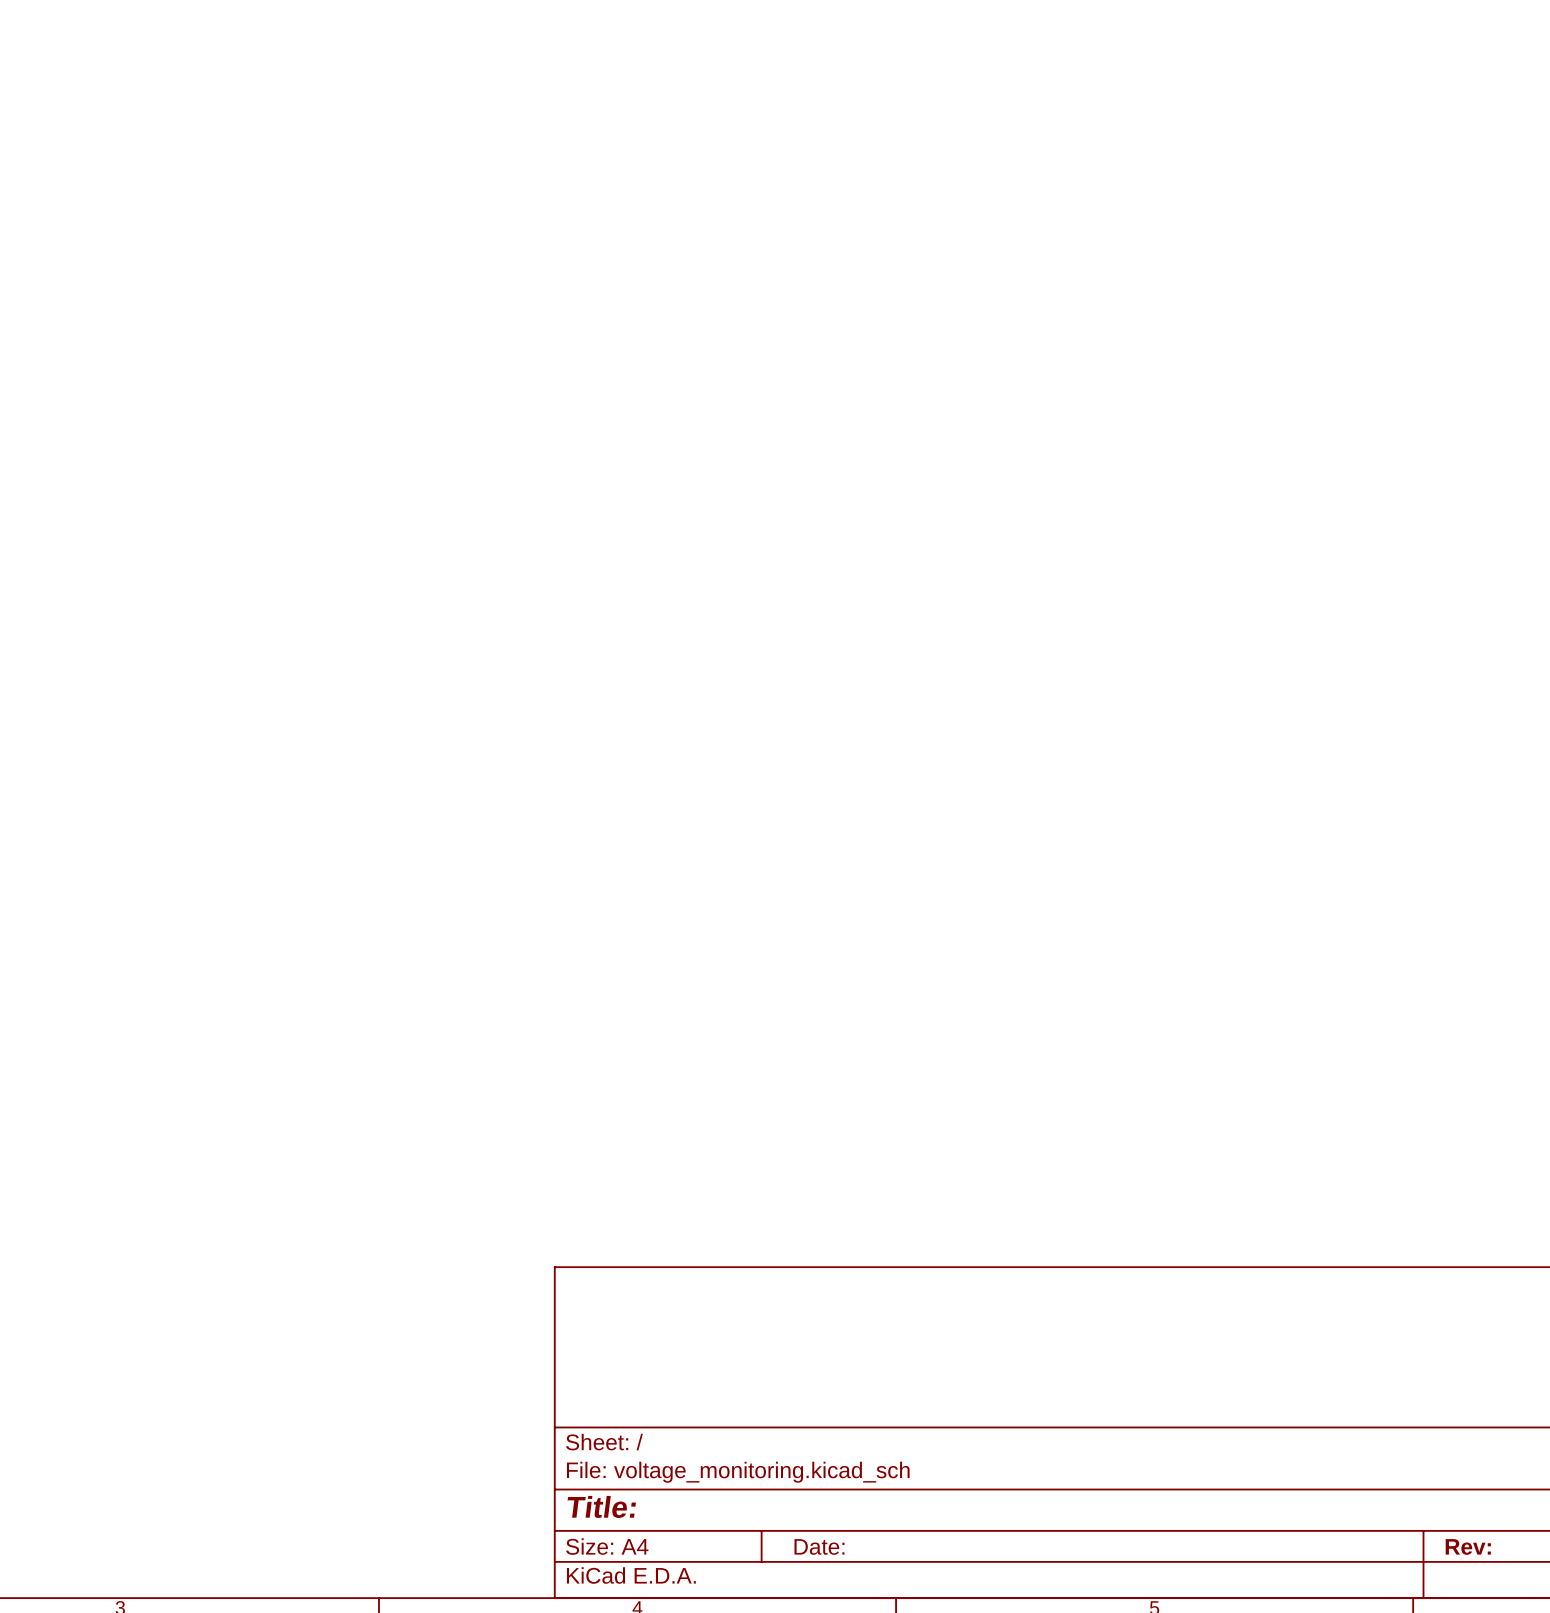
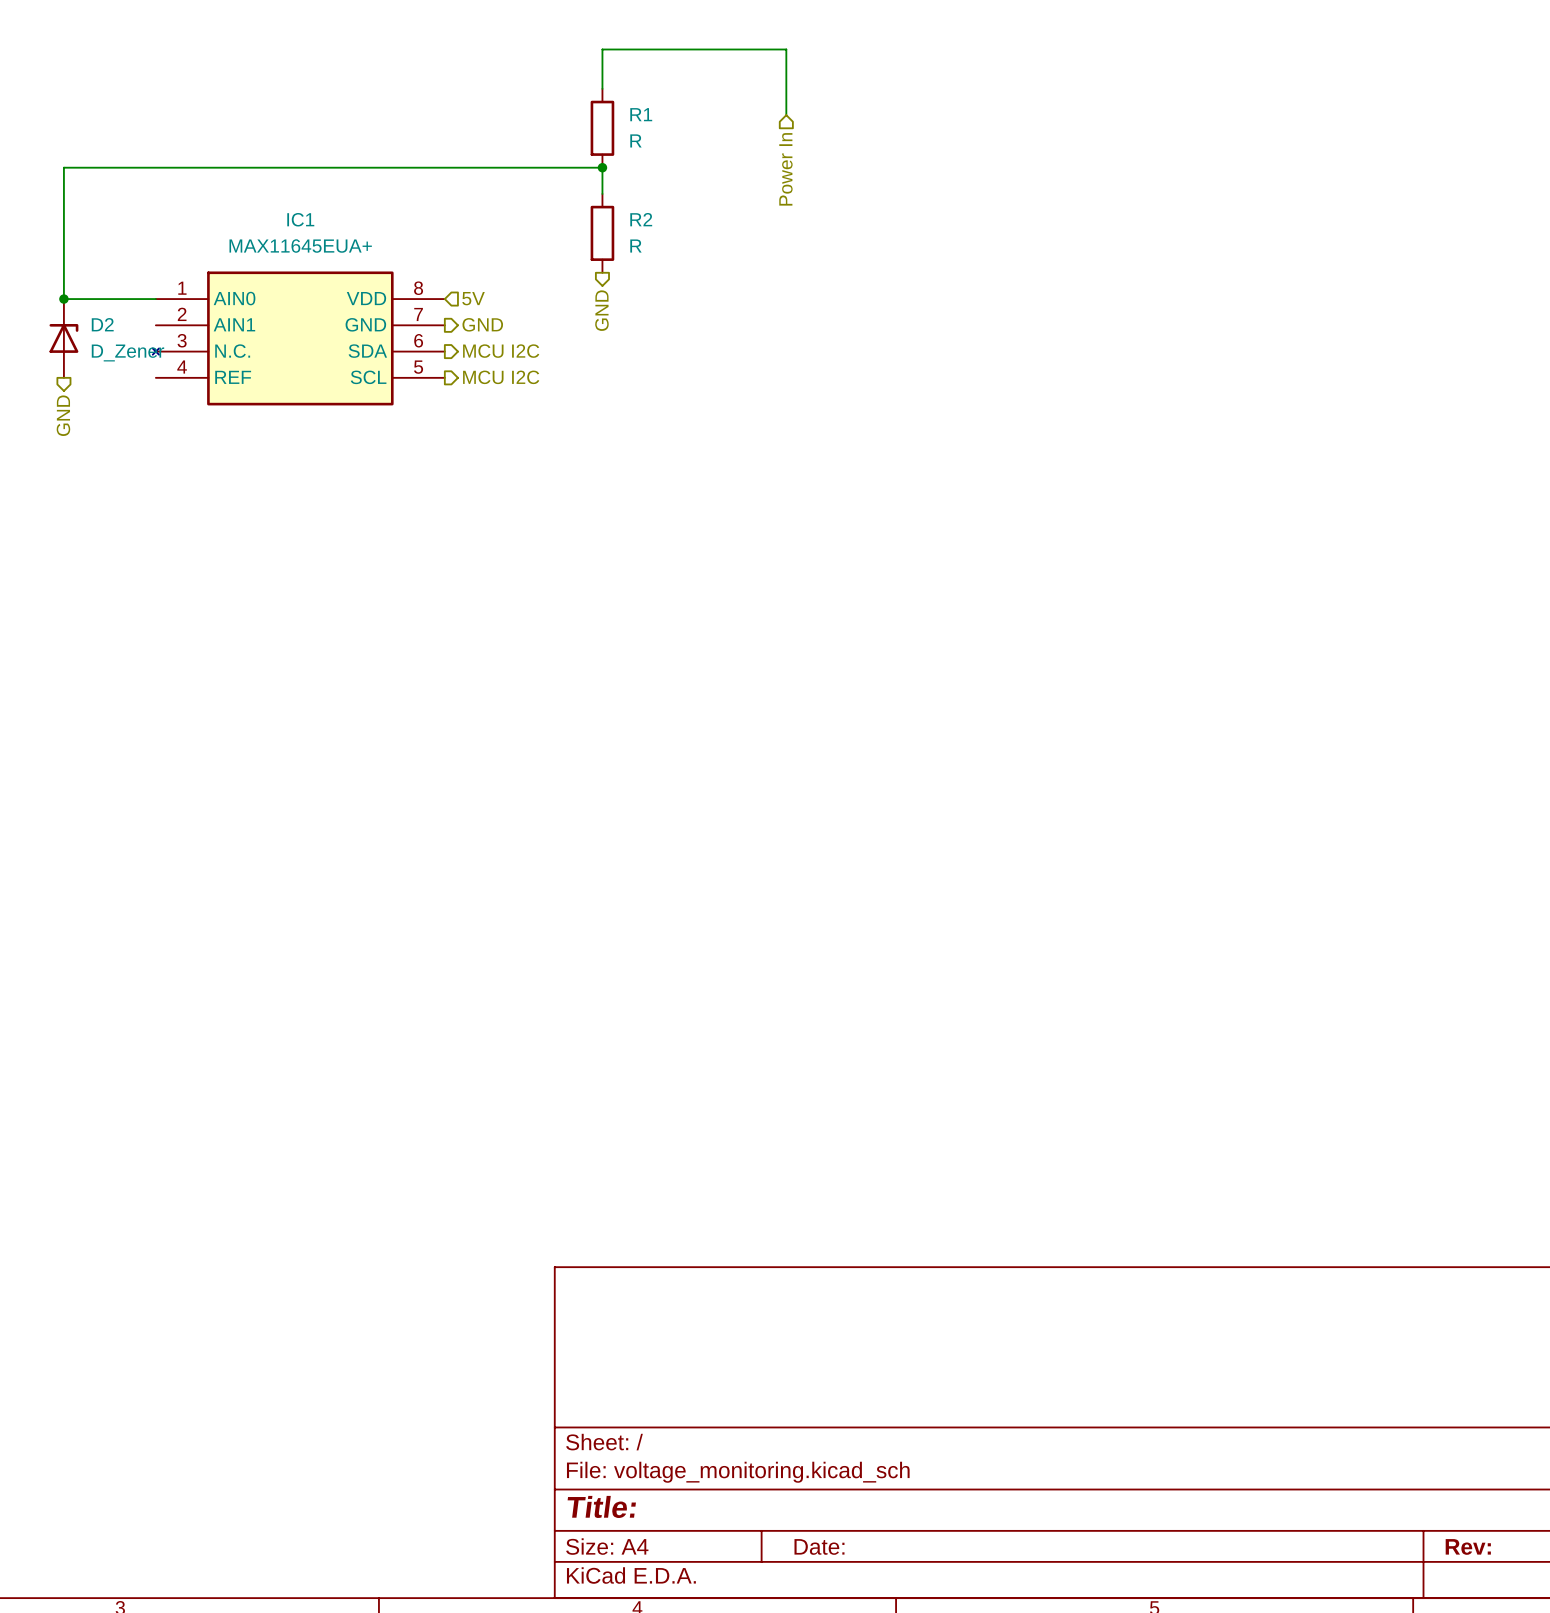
wire: none -> (602, 88) (602, 49) (786, 49) (786, 115)
R1: none -> R (602, 128)
junction: none -> (602, 167)
hierarchical label: none -> Power In (785, 169)
wire: none -> (602, 193) (602, 167) (63, 167) (63, 299) (155, 299)
R2: none -> R (602, 233)
hierarchical label: none -> 5V (473, 298)
junction: none -> (63, 299)
hierarchical label: none -> GND (601, 310)
hierarchical label: none -> GND (482, 324)
D2: none -> D_Zener (63, 338)
IC1: none -> MAX11645EUA+ (298, 338)
hierarchical label: none -> MCU I2C (501, 351)
hierarchical label: none -> MCU I2C (501, 377)
hierarchical label: none -> GND (63, 415)

